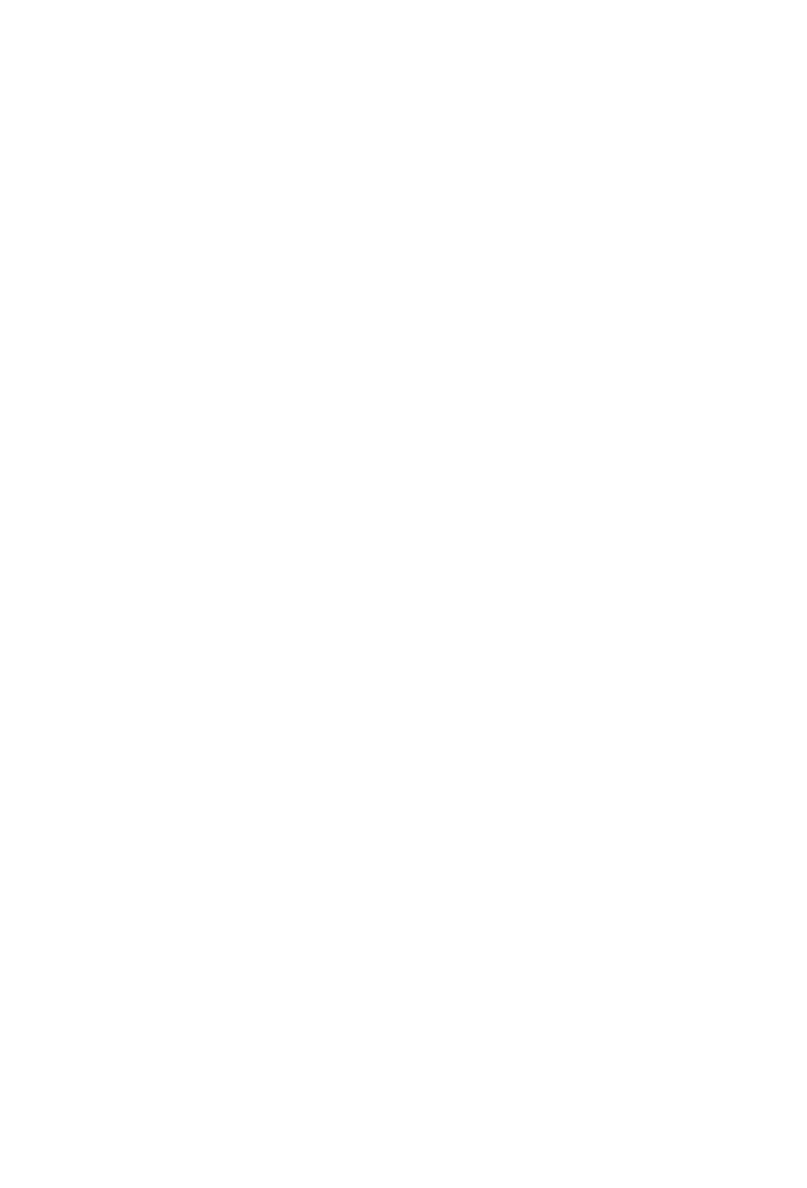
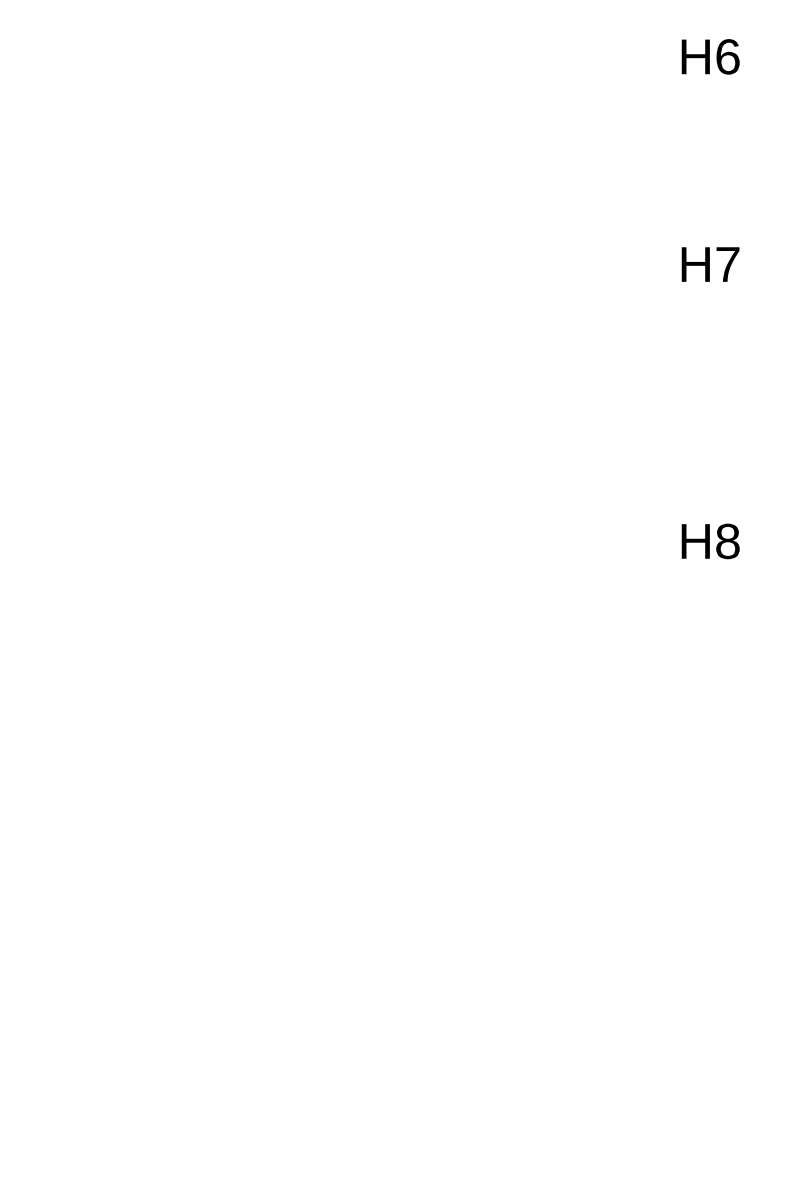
label: none -> H6 (710, 56)
label: none -> H7 (710, 264)
label: none -> H8 (710, 541)

